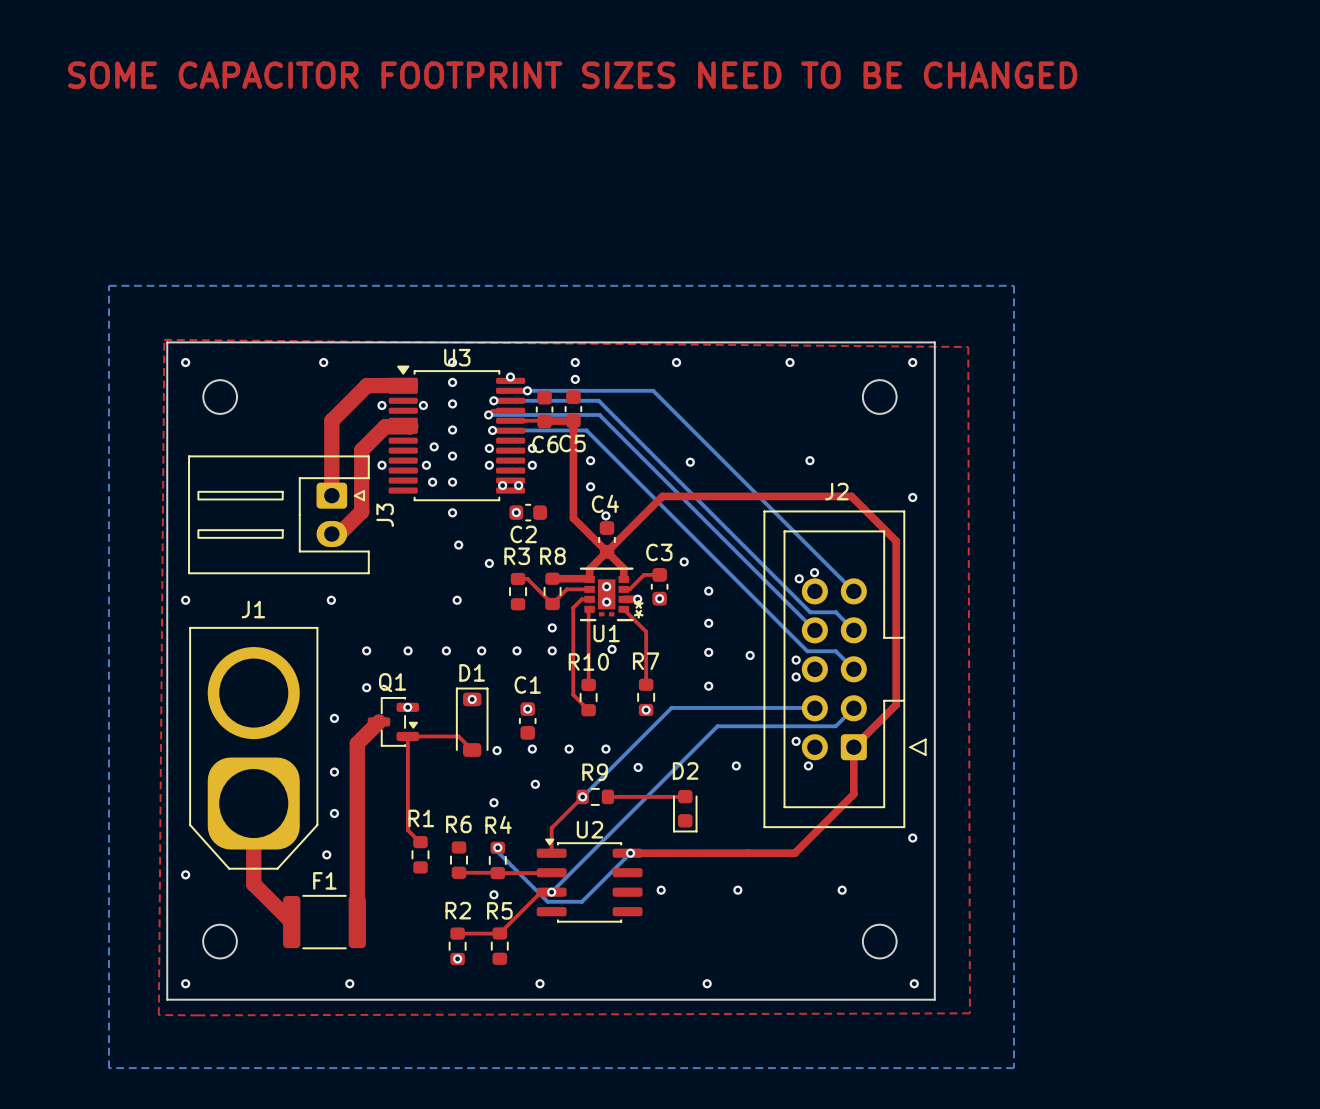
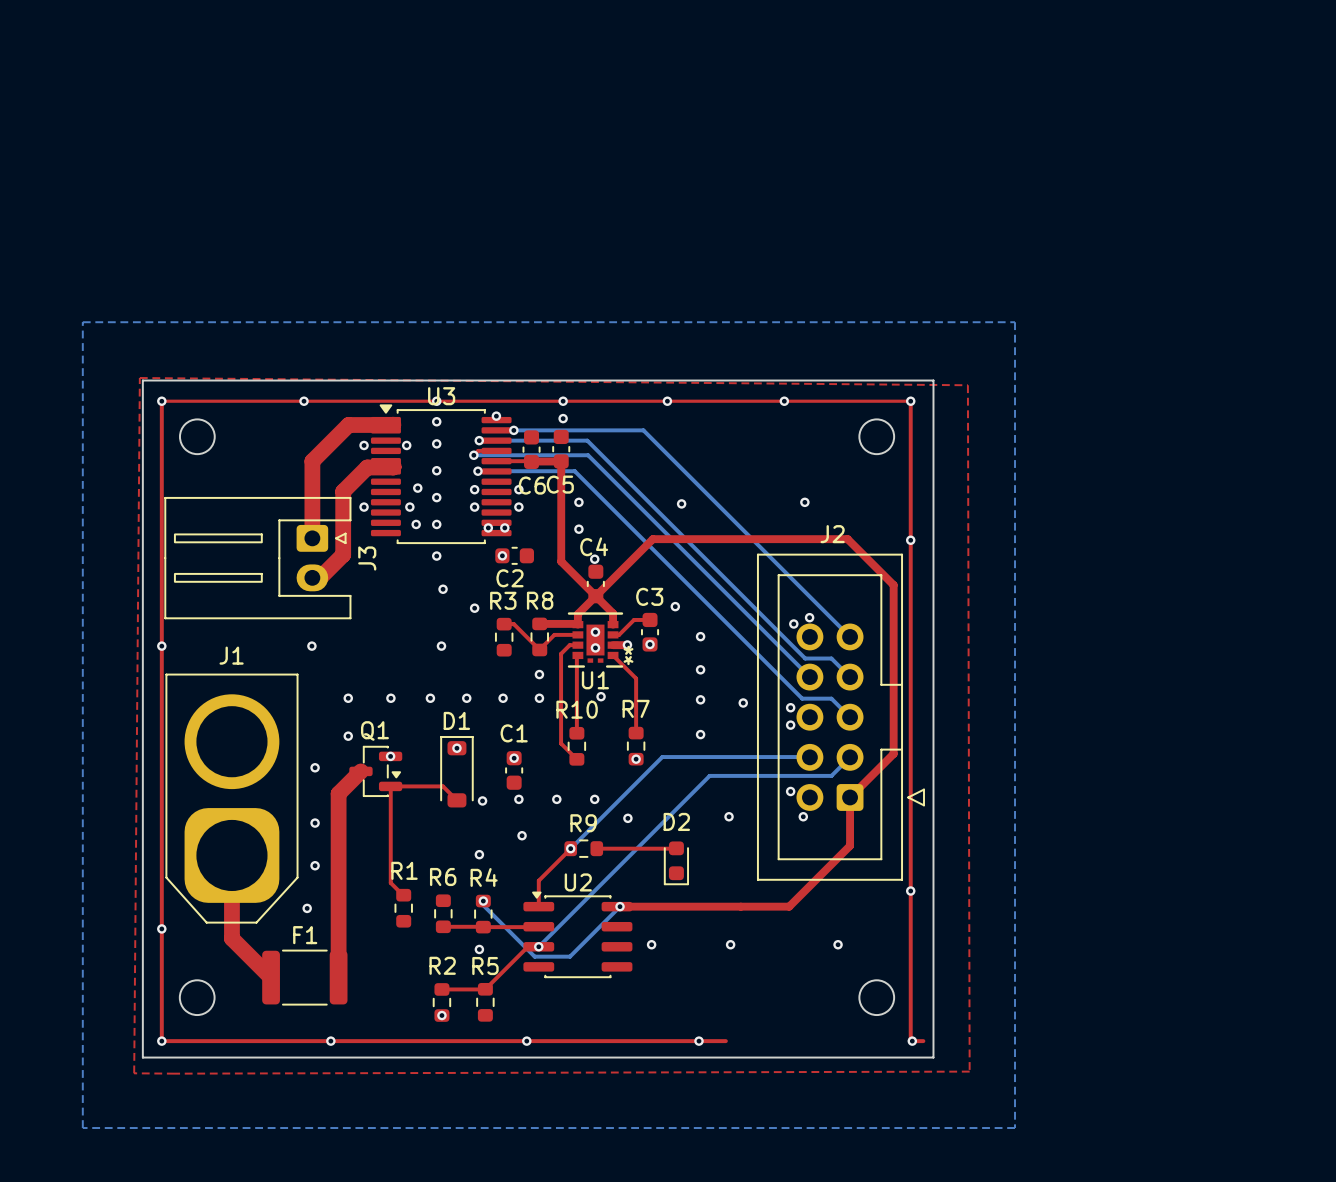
text: SOME CAPACITOR FOOTPRINT SIZES NEED TO BE CHANGED (572, 75) -> none
top track: none -> (910, 1039) (910, 401) (161, 401) (161, 1041) (725, 1041)
top track: none -> (912, 1041) (923, 1041)

